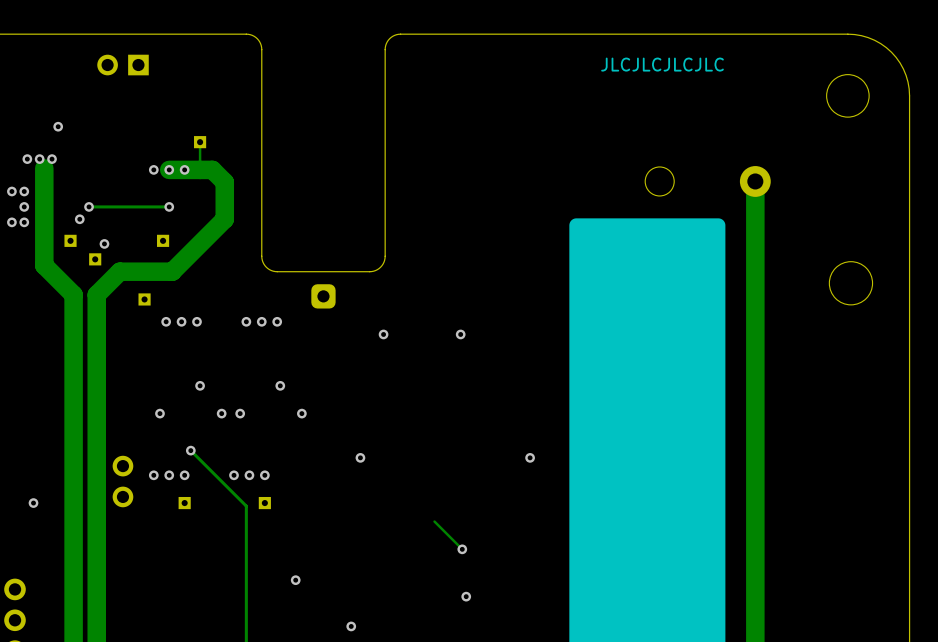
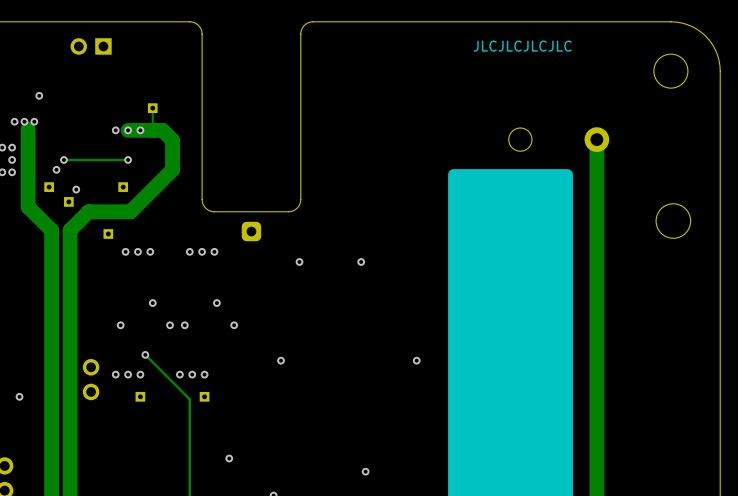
track: (434, 521) (462, 549) -> none
via: (462, 549) -> none

